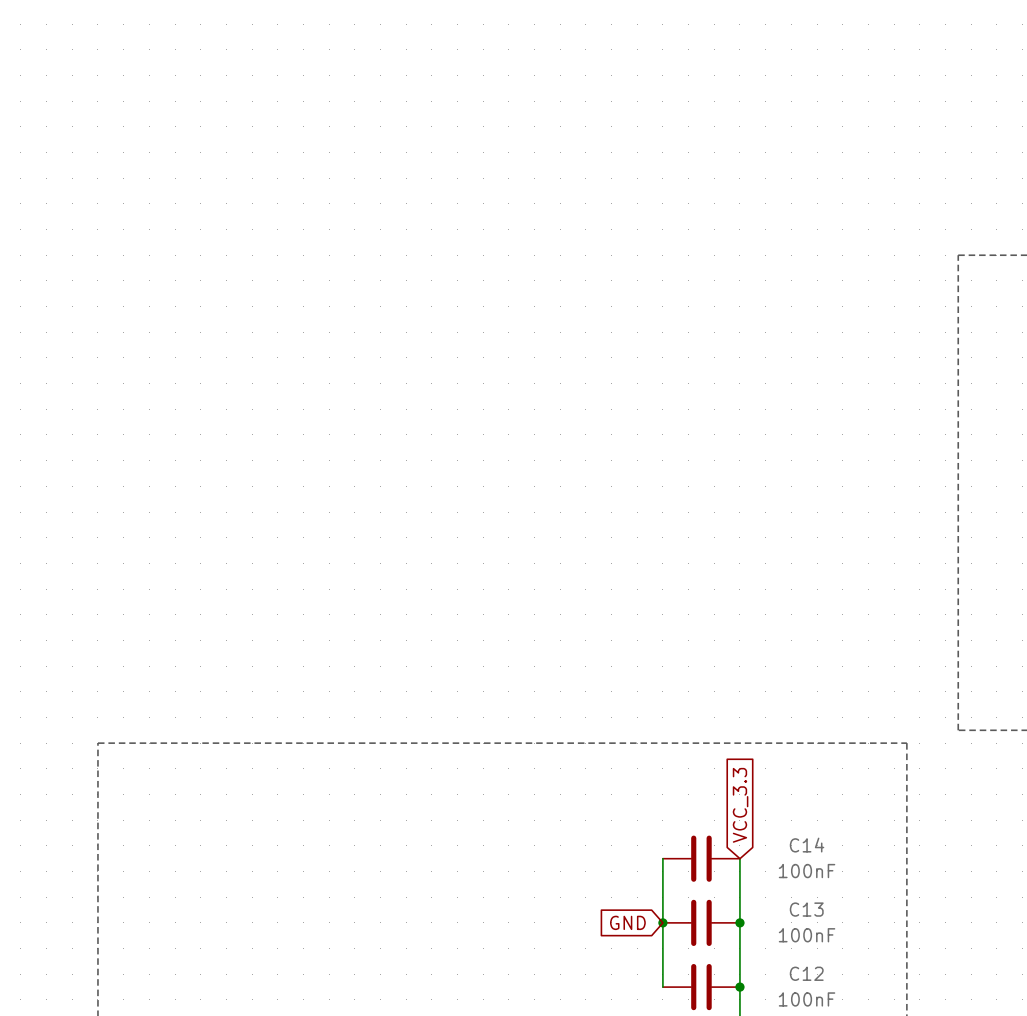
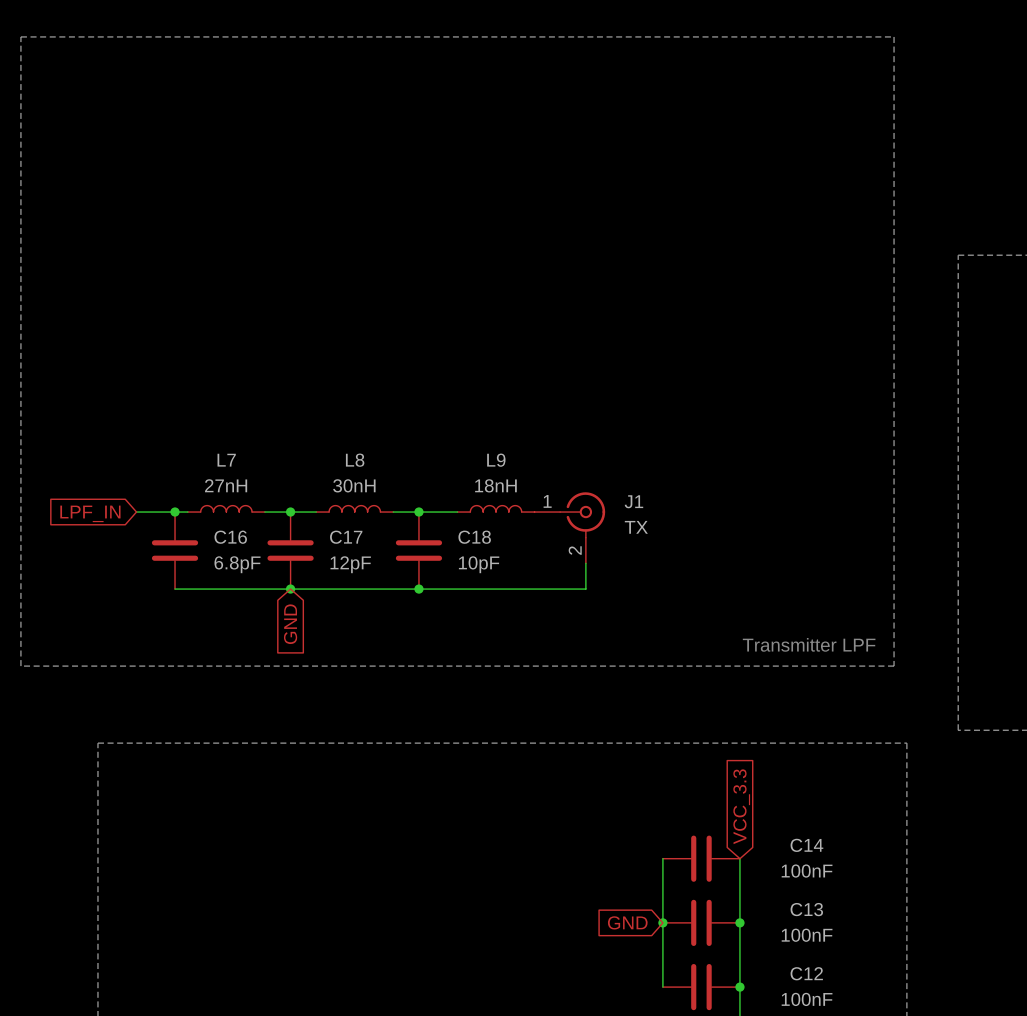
line: none -> (20, 36) (894, 36) (894, 666) (20, 666) (20, 36)
L7: none -> 27nH (226, 508)
L8: none -> 30nH (354, 508)
L9: none -> 18nH (496, 508)
global label: none -> LPF_IN (90, 513)
wire: none -> (136, 512) (187, 512)
junction: none -> (175, 512)
wire: none -> (264, 512) (316, 512)
junction: none -> (290, 512)
wire: none -> (393, 512) (457, 512)
junction: none -> (418, 512)
J1: none -> TX (569, 527)
C16: none -> 6.8pF (175, 550)
C17: none -> 12pF (290, 550)
C18: none -> 10pF (418, 550)
wire: none -> (585, 563) (585, 589) (175, 589)
junction: none -> (290, 589)
junction: none -> (418, 589)
global label: none -> GND (290, 624)
text: none -> Transmitter LPF (809, 644)

